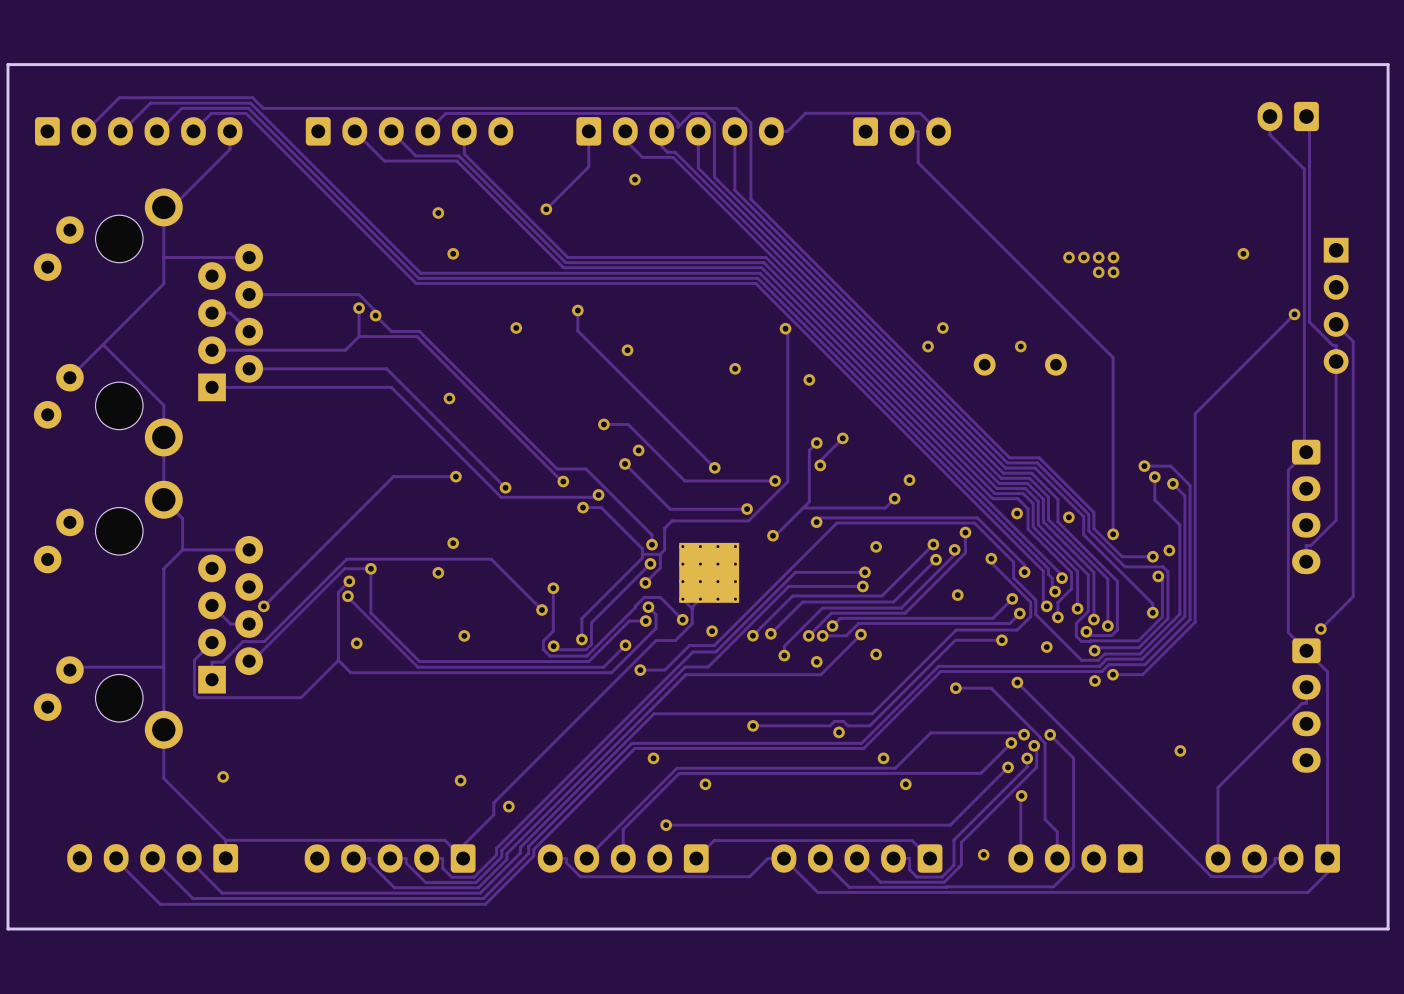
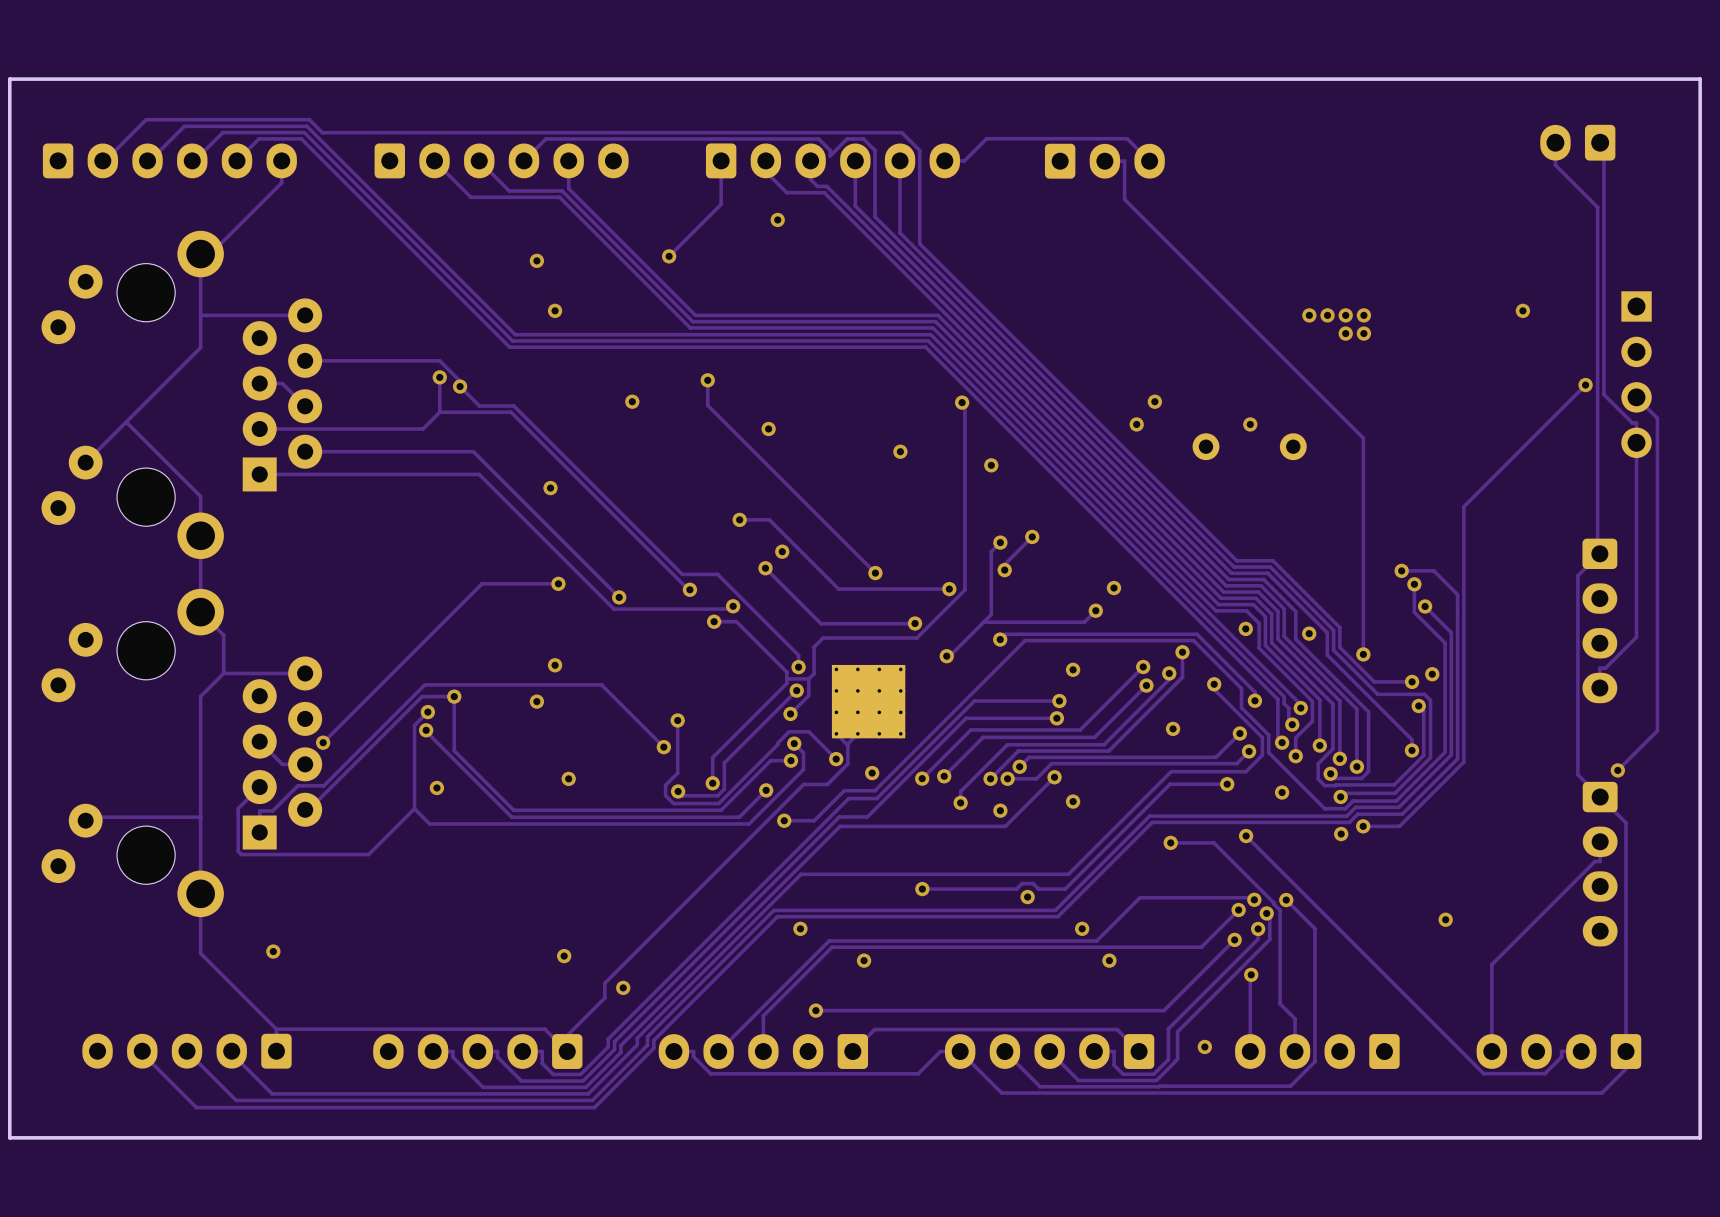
track: (1172, 483) (1184, 495) (1184, 516) -> (1425, 606) (1451, 632)
via position: (1172, 483) -> (1425, 606)

